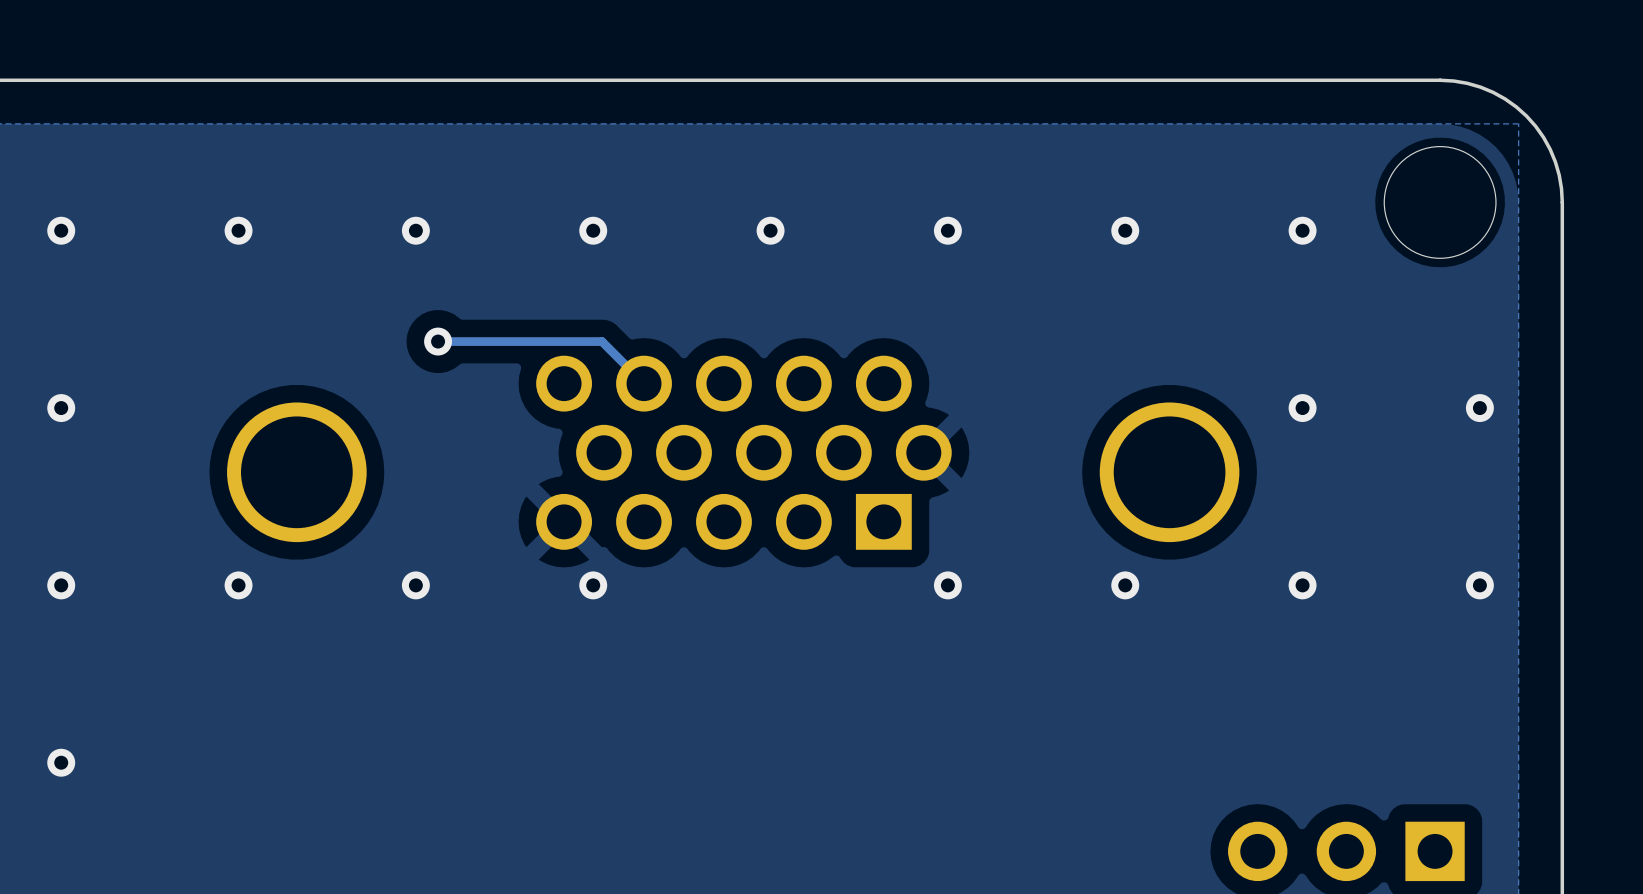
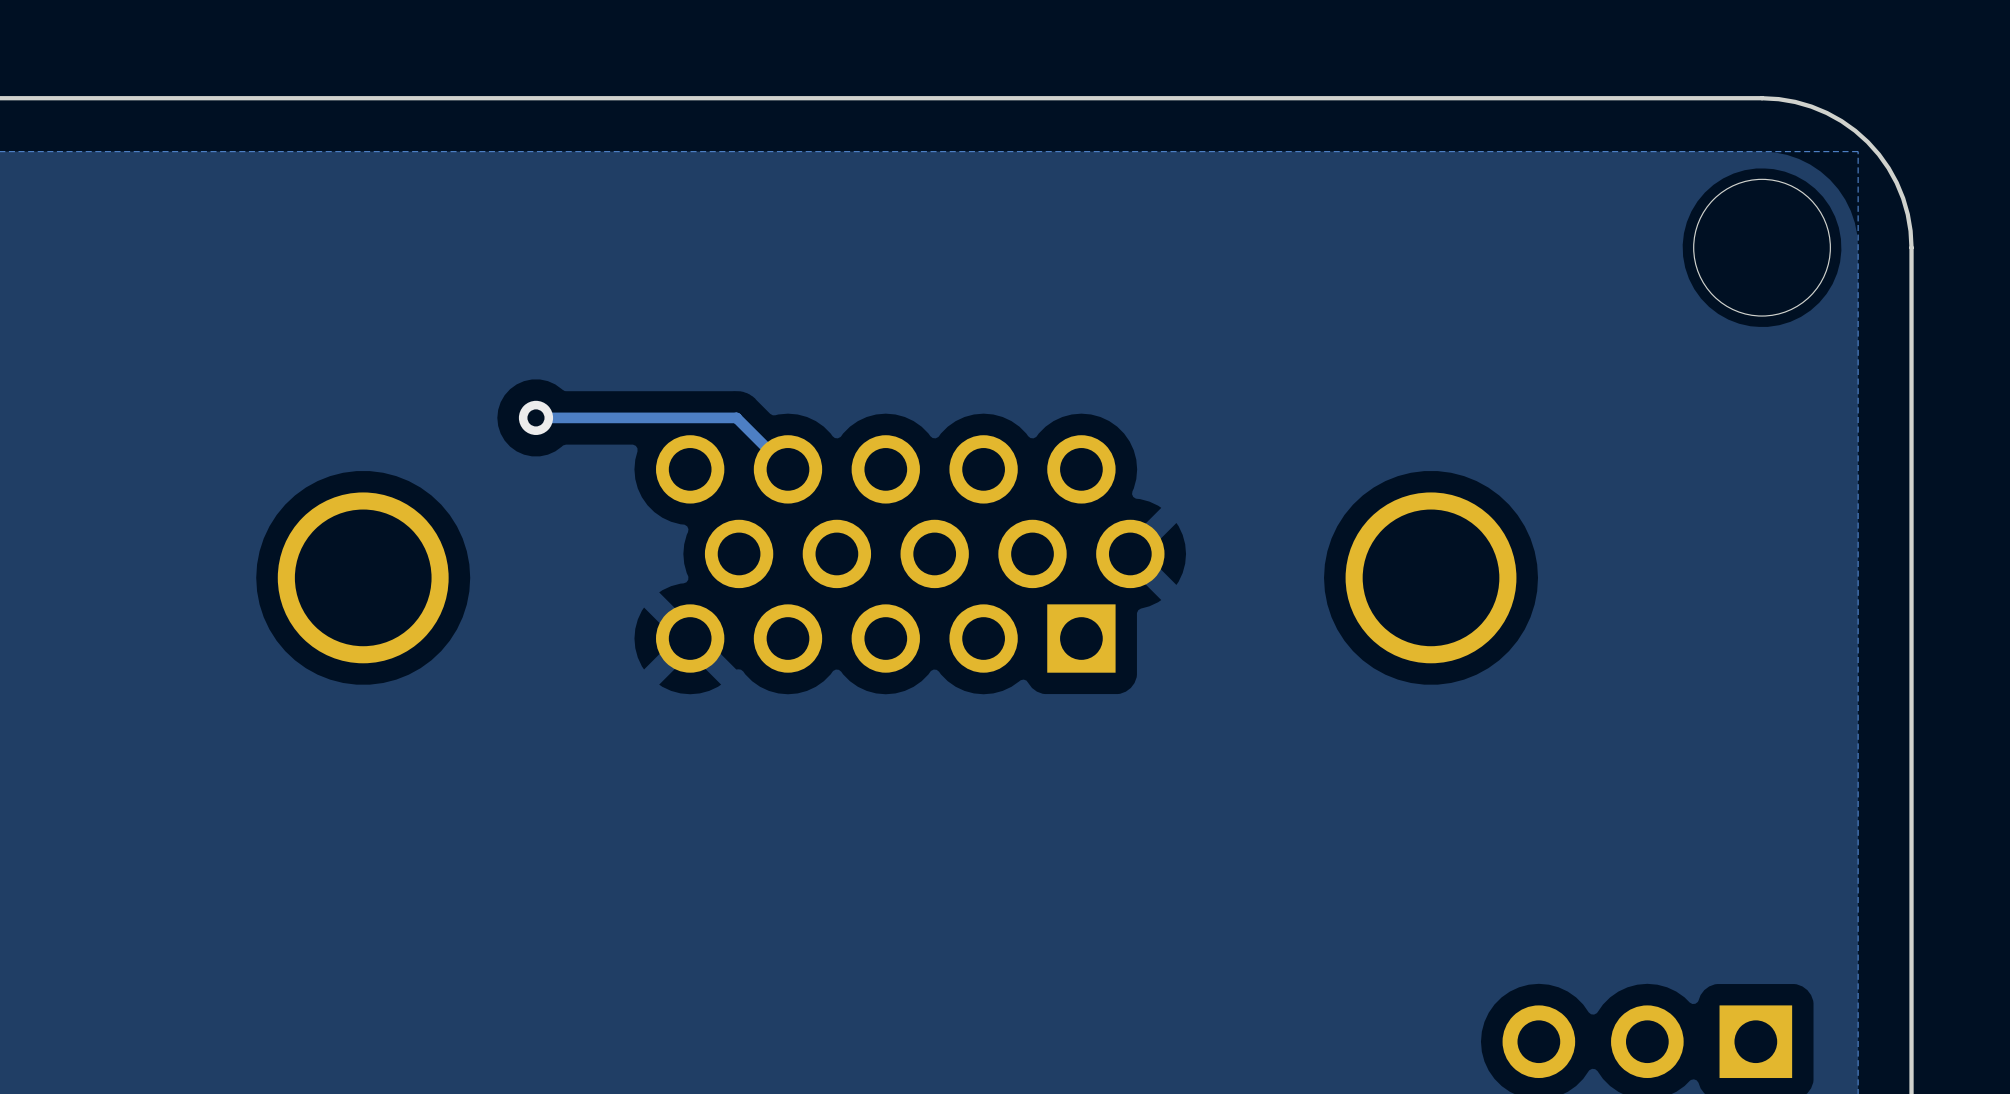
via: (61, 230) -> none
via: (238, 230) -> none
via: (415, 230) -> none
via: (593, 230) -> none
via: (770, 230) -> none
via: (947, 230) -> none
via: (1125, 230) -> none
via: (1302, 230) -> none
via: (61, 408) -> none
via: (1302, 408) -> none
via: (1479, 408) -> none
via: (61, 585) -> none
via: (238, 585) -> none
via: (415, 585) -> none
via: (593, 585) -> none
via: (947, 585) -> none
via: (1125, 585) -> none
via: (1302, 585) -> none
via: (1479, 585) -> none
via: (61, 762) -> none

